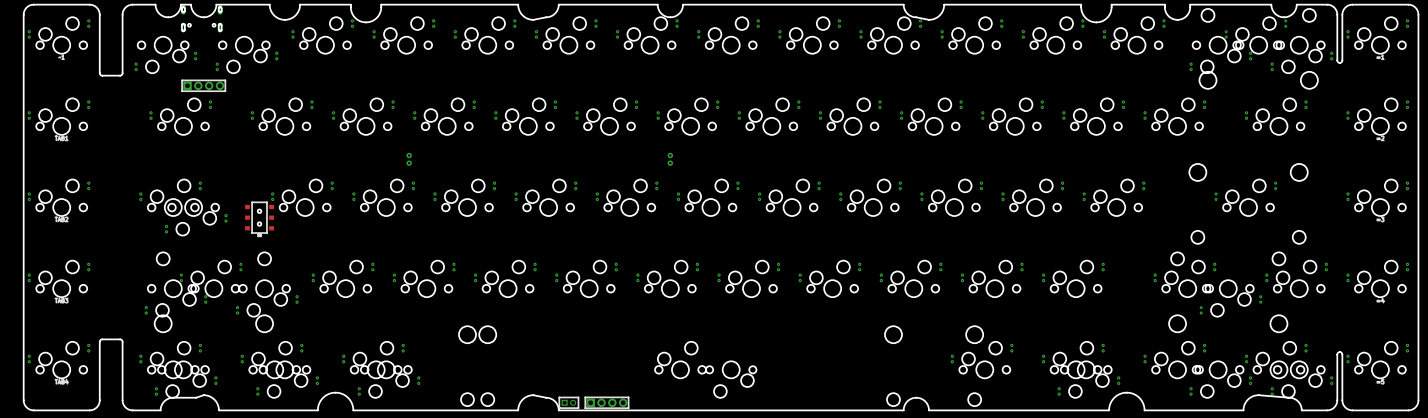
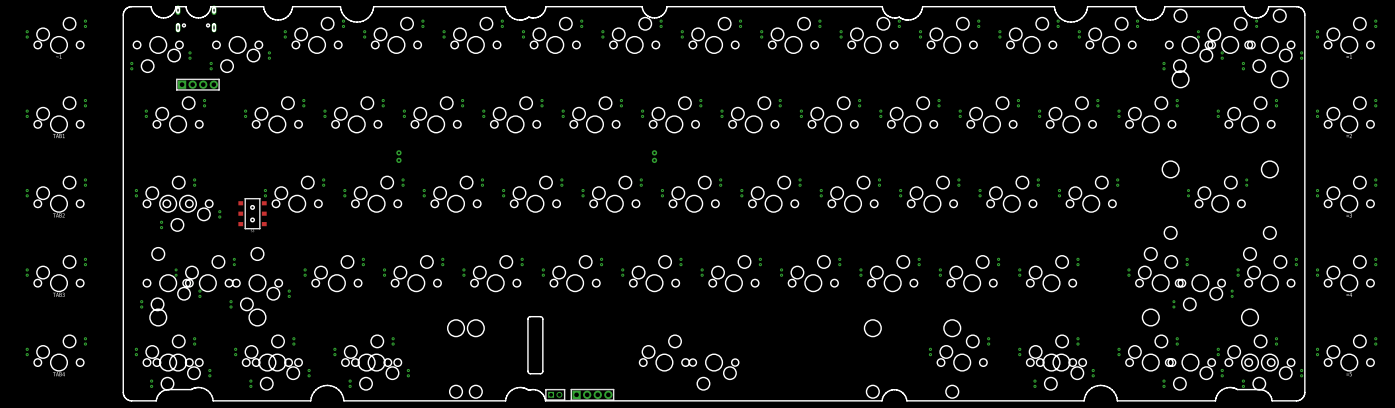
board edge: (33, 4) (89, 4) (96, 7) (99, 13) (99, 73) (102, 75) (122, 74) (122, 13) (126, 6) (132, 4) (155, 4) (159, 13) (168, 17) (177, 13) (180, 4) (191, 4) (194, 13) (203, 17) (212, 13) (216, 4) (269, 4) (274, 15) (284, 19) (295, 15) (300, 4) (350, 4) (353, 16) (360, 21) (366, 22) (371, 21) (378, 16) (381, 4) (518, 4) (522, 15) (533, 19) (552, 15) (557, 10) (558, 4) (657, 4) (661, 13) (670, 17) (679, 13) (683, 4) (903, 4) (905, 10) (909, 15) (929, 19) (939, 15) (944, 4) (1081, 4) (1084, 16) (1090, 21) (1096, 22) (1102, 21) (1108, 16) (1111, 4) (1164, 4) (1167, 14) (1177, 19) (1187, 14) (1190, 4) (1271, 4) (1275, 13) (1284, 17) (1293, 13) (1296, 4) (1327, 4) (1333, 6) (1336, 12) (1337, 60) (1339, 62) (1342, 60) (1342, 13) (1346, 6) (1352, 4) (1410, 4) (1416, 8) (1418, 14) (1418, 402) (1414, 408) (1409, 410) (1347, 409) (1342, 401) (1342, 354) (1339, 352) (1337, 354) (1336, 402) (1333, 408) (1327, 410) (1301, 410) (1300, 404) (1293, 398) (1258, 395) (1247, 399) (1243, 410) (1144, 410) (1139, 397) (1126, 392) (1114, 397) (1109, 410) (929, 410) (925, 401) (916, 397) (907, 401) (903, 410) (558, 410) (557, 404) (552, 399) (533, 395) (522, 399) (518, 410) (353, 410) (348, 397) (335, 392) (323, 397) (317, 410) (218, 410) (214, 399) (203, 395) (196, 397) (168, 398) (162, 404) (160, 410) (132, 410) (126, 408) (122, 401) (122, 340) (102, 339) (99, 341) (99, 401) (96, 407) (89, 410) (31, 410) (25, 406) (23, 400) (23, 14) (26, 7) (33, 4) -> (131, 6) (125, 9) (123, 15) (123, 392) (128, 400) (156, 400) (158, 394) (164, 390) (198, 387) (208, 391) (213, 400) (310, 400) (315, 389) (327, 385) (338, 389) (343, 400) (505, 400) (510, 391) (520, 387) (539, 391) (545, 400) (882, 400) (886, 392) (894, 389) (902, 392) (906, 400) (1084, 400) (1089, 389) (1100, 385) (1112, 389) (1117, 400) (1215, 400) (1220, 391) (1230, 387) (1264, 390) (1269, 394) (1272, 400) (1298, 400) (1304, 395) (1304, 15) (1299, 7) (1268, 6) (1264, 14) (1256, 17) (1247, 14) (1243, 6) (1164, 6) (1160, 16) (1150, 20) (1140, 16) (1135, 6) (1087, 6) (1082, 17) (1070, 22) (1059, 17) (1054, 6) (922, 6) (918, 16) (908, 20) (888, 16) (882, 6) (666, 6) (662, 14) (654, 17) (646, 14) (642, 6) (545, 6) (540, 16) (519, 20) (510, 16) (505, 6) (373, 6) (368, 17) (357, 22) (345, 17) (340, 6) (292, 6) (288, 16) (278, 20) (268, 16) (263, 6) (210, 6) (206, 14) (198, 17) (190, 14) (186, 6) (175, 6) (171, 14) (163, 17) (155, 14) (151, 6) (131, 6)
board edge: none -> (530, 316) (540, 316) (542, 318) (542, 371) (540, 373) (530, 373) (527, 371) (527, 319) (530, 316)

